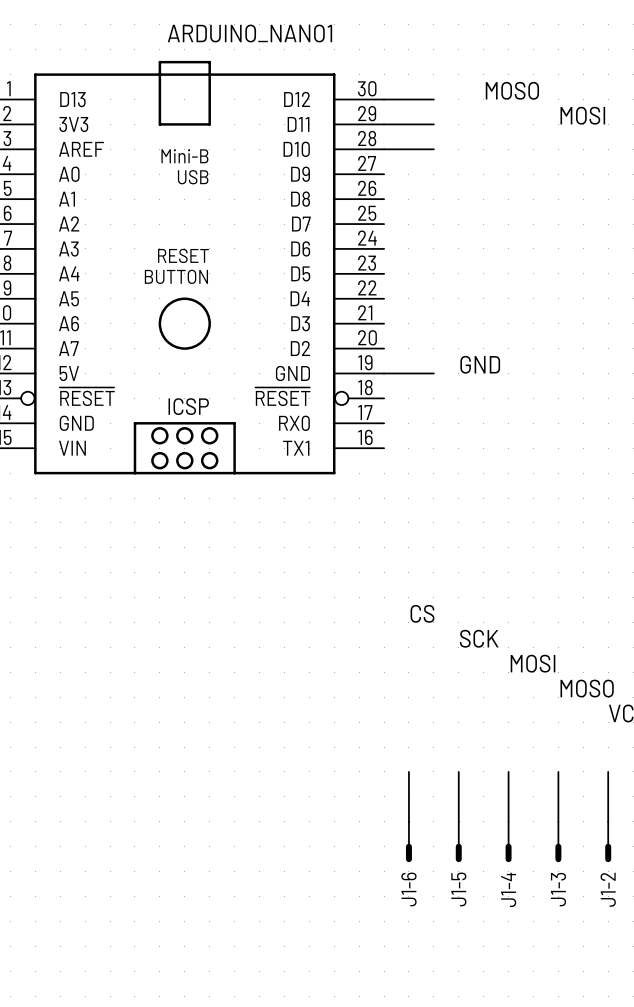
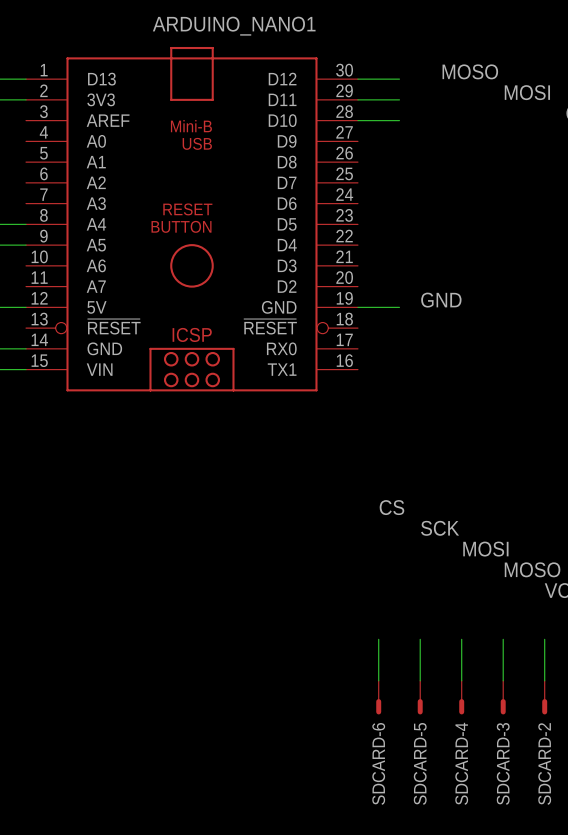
J1-6 name: J1-6 (408, 889) -> SDCARD-6 (378, 763)
J1-5 name: J1-5 (458, 889) -> SDCARD-5 (420, 763)
J1-4 name: J1-4 (508, 889) -> SDCARD-4 (461, 763)
J1-3 name: J1-3 (558, 889) -> SDCARD-3 (503, 763)
J1-2 name: J1-2 (608, 889) -> SDCARD-2 (544, 763)

